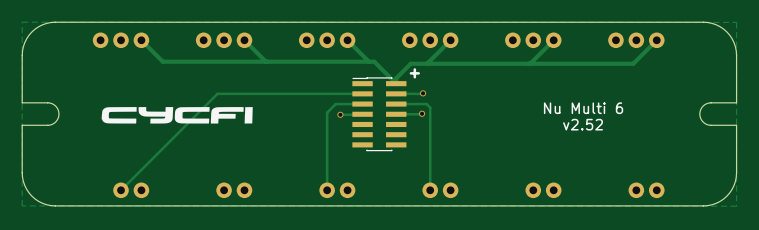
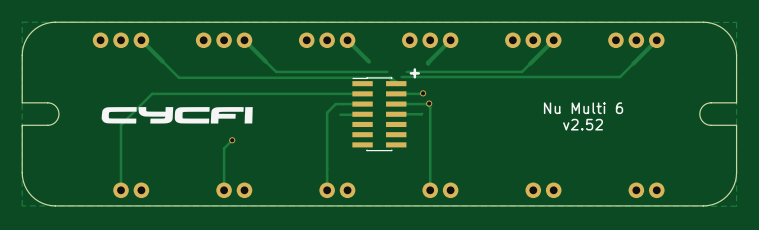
track: (162, 61) (374, 61) (390, 77) -> (162, 61) (178, 77) (390, 77)
track: none -> (265, 61) (276, 71) (387, 71)
track: none -> (530, 63) (522, 71) (406, 71)
track: (633, 63) (410, 63) (396, 78) (396, 82) -> (633, 63) (620, 77) (401, 77)
track: (217, 93) (121, 190) -> (217, 93) (152, 93) (121, 124) (121, 190)
via position: (422, 113) -> (429, 103)
via: (340, 114) -> none
track: none -> (232, 140) (224, 148) (224, 190)
via: none -> (232, 140)

